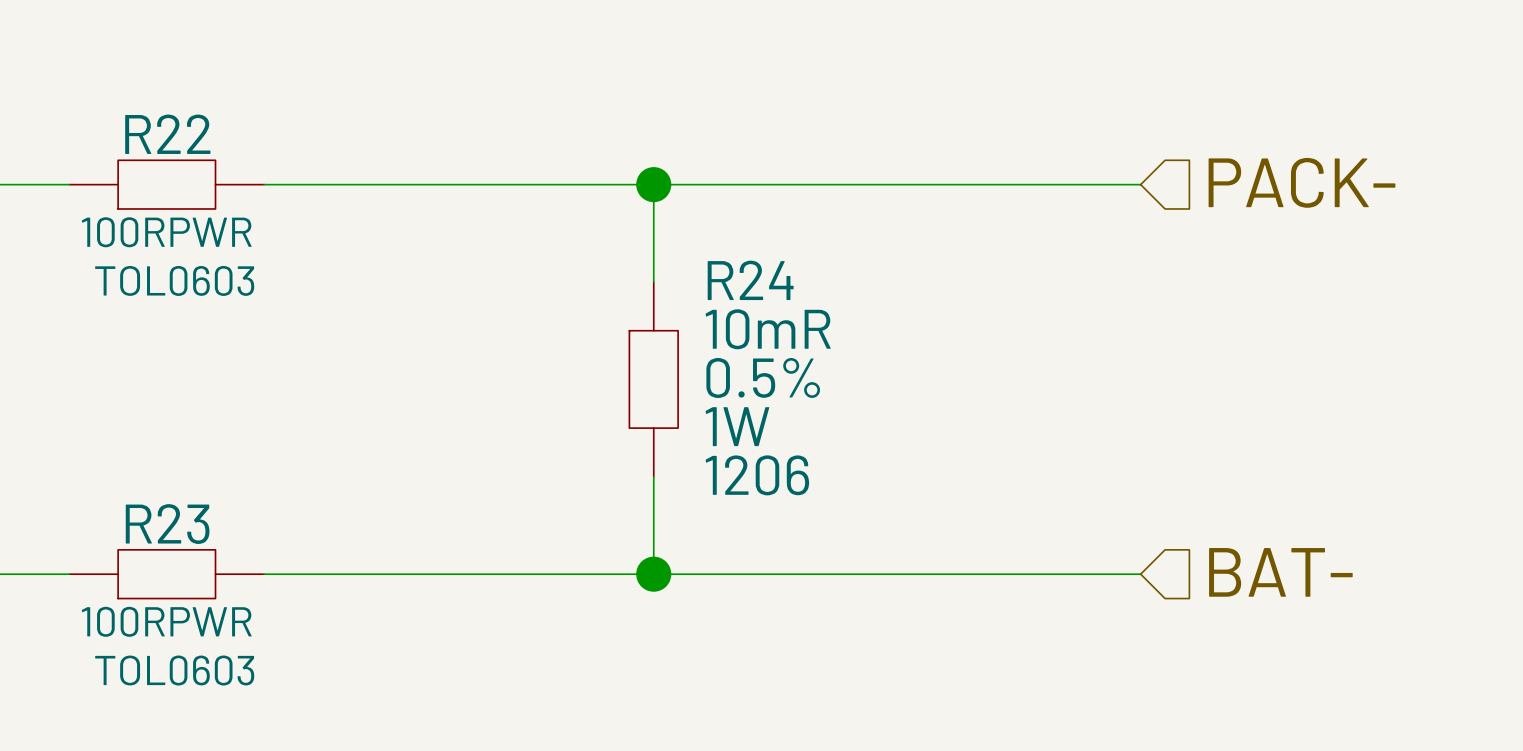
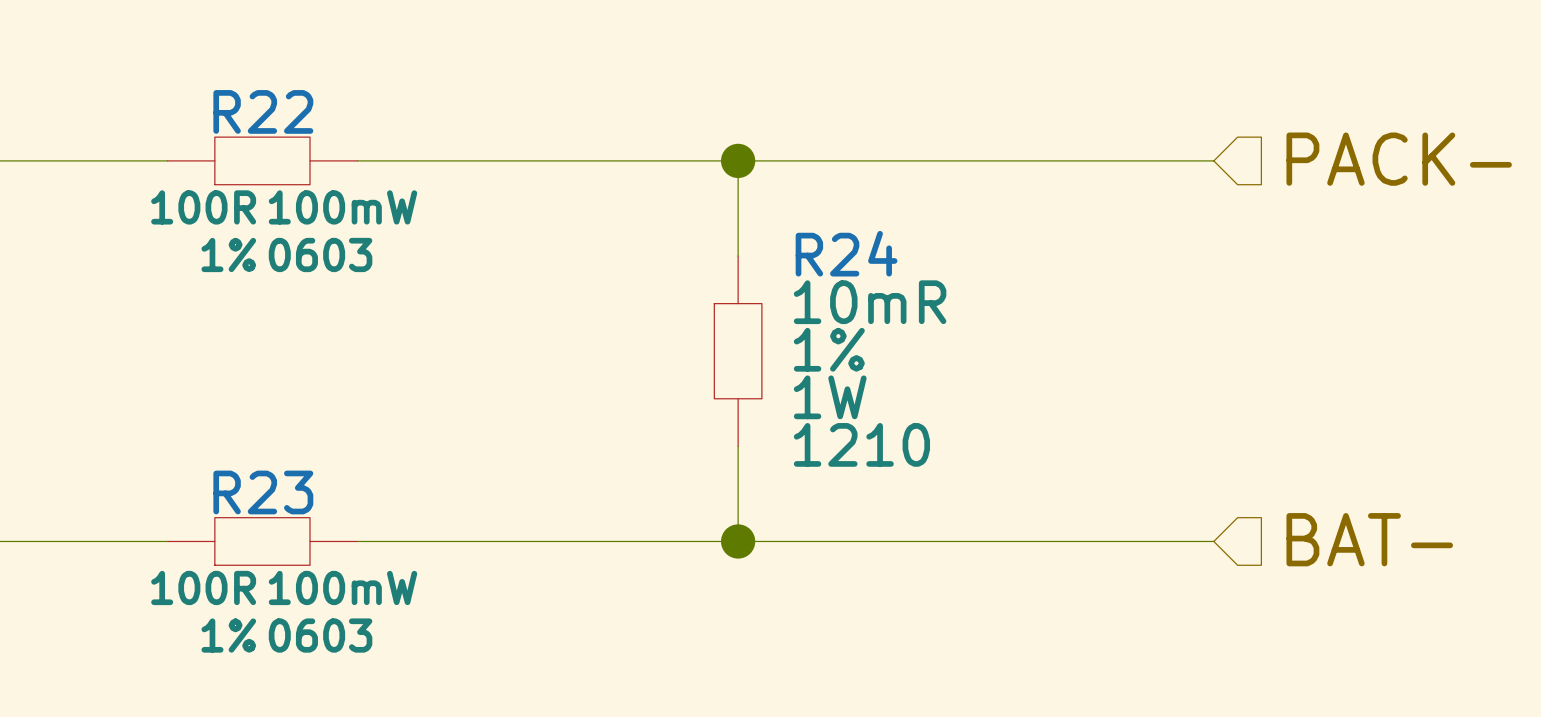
R22 text: PWR (211, 232) -> 100mW (342, 207)
R22 text: TOL (130, 280) -> 1% (228, 254)
R24 text: 0.5% (763, 377) -> 1% (829, 349)
R24 text: 1206 (757, 475) -> 1210 (861, 444)
R23 text: PWR (211, 621) -> 100mW (342, 587)
R23 text: TOL (130, 670) -> 1% (228, 635)

